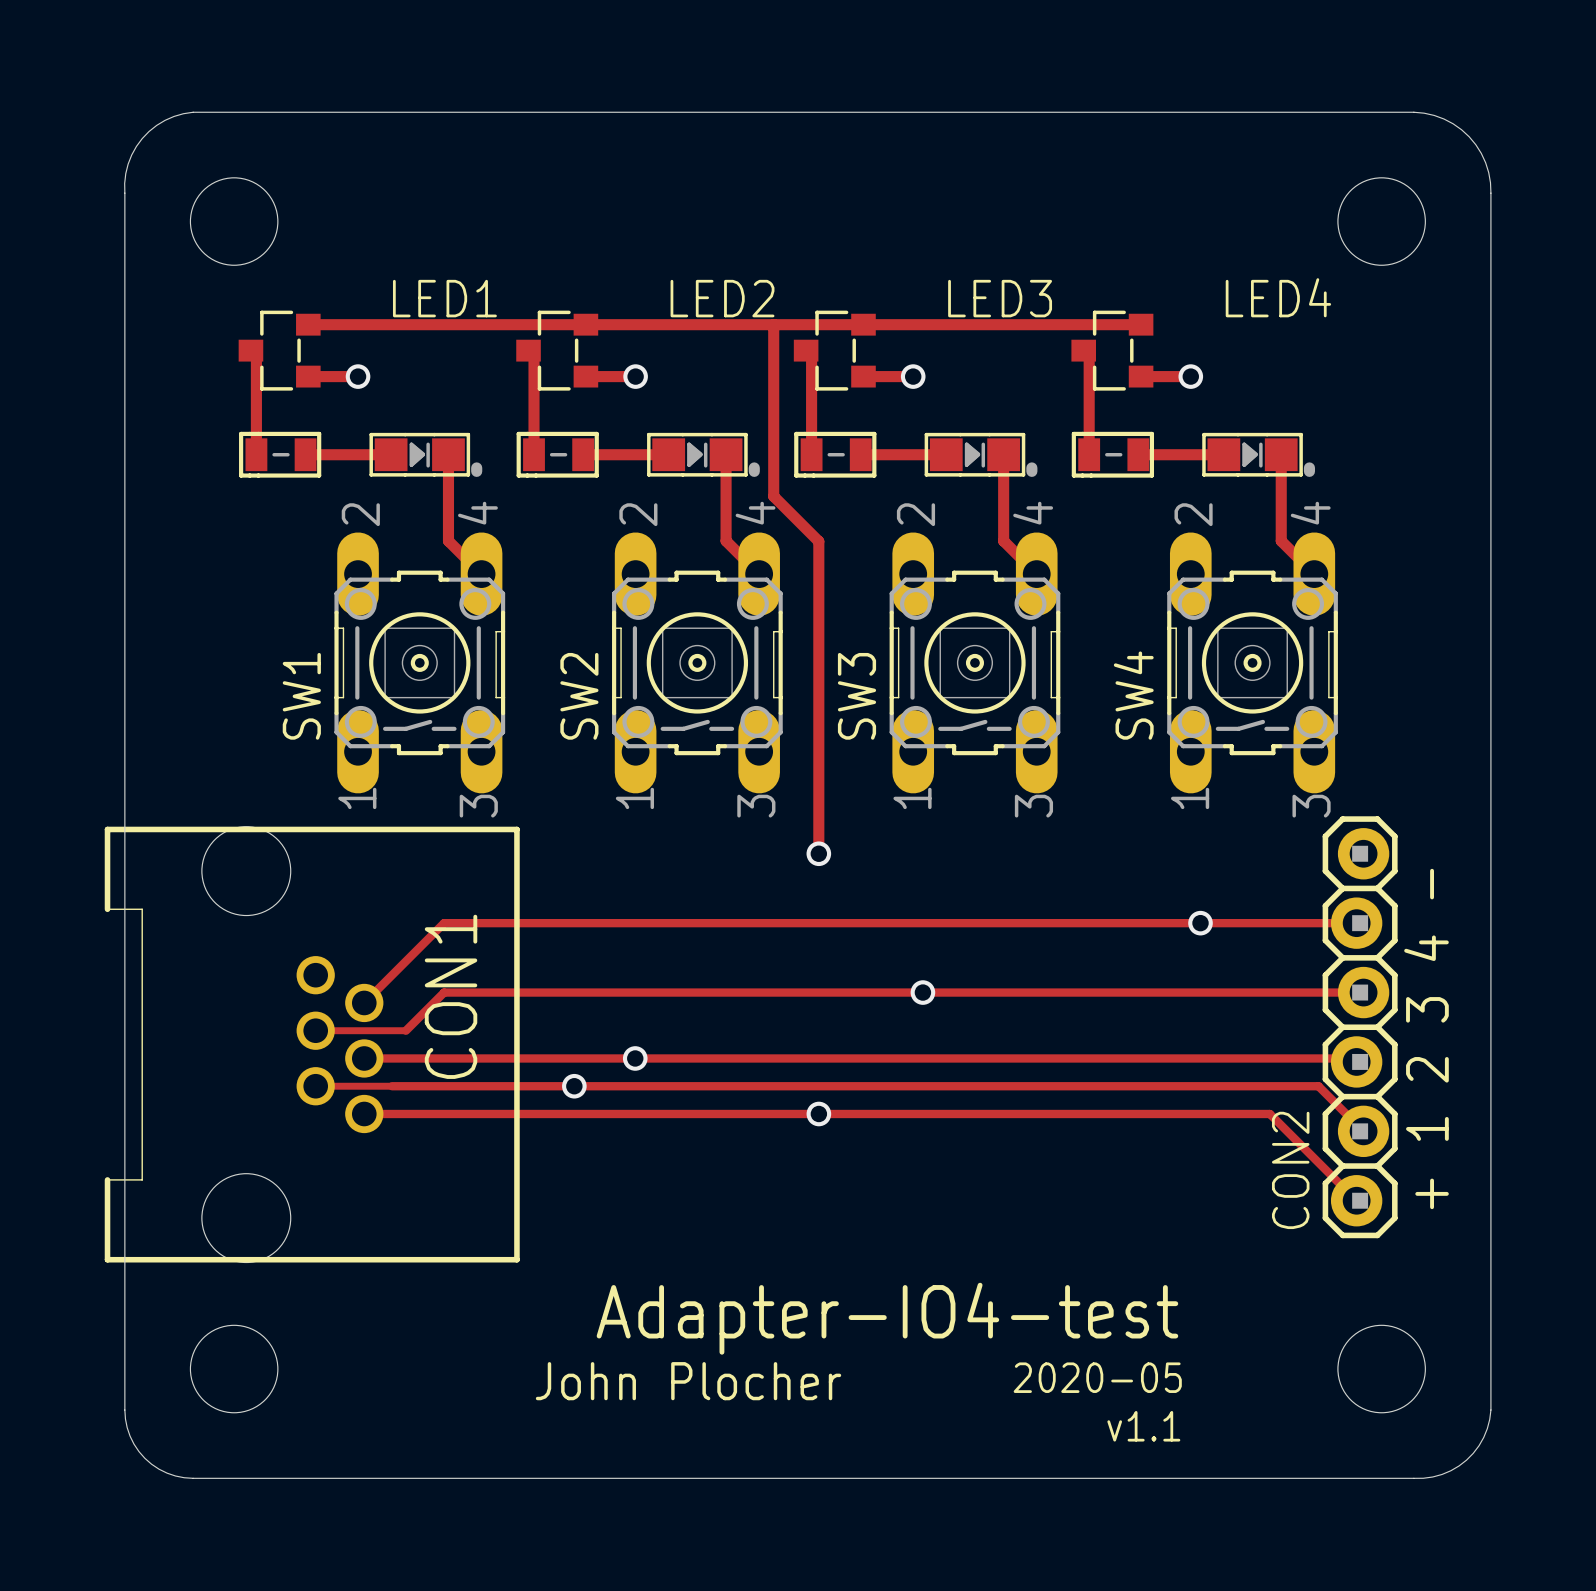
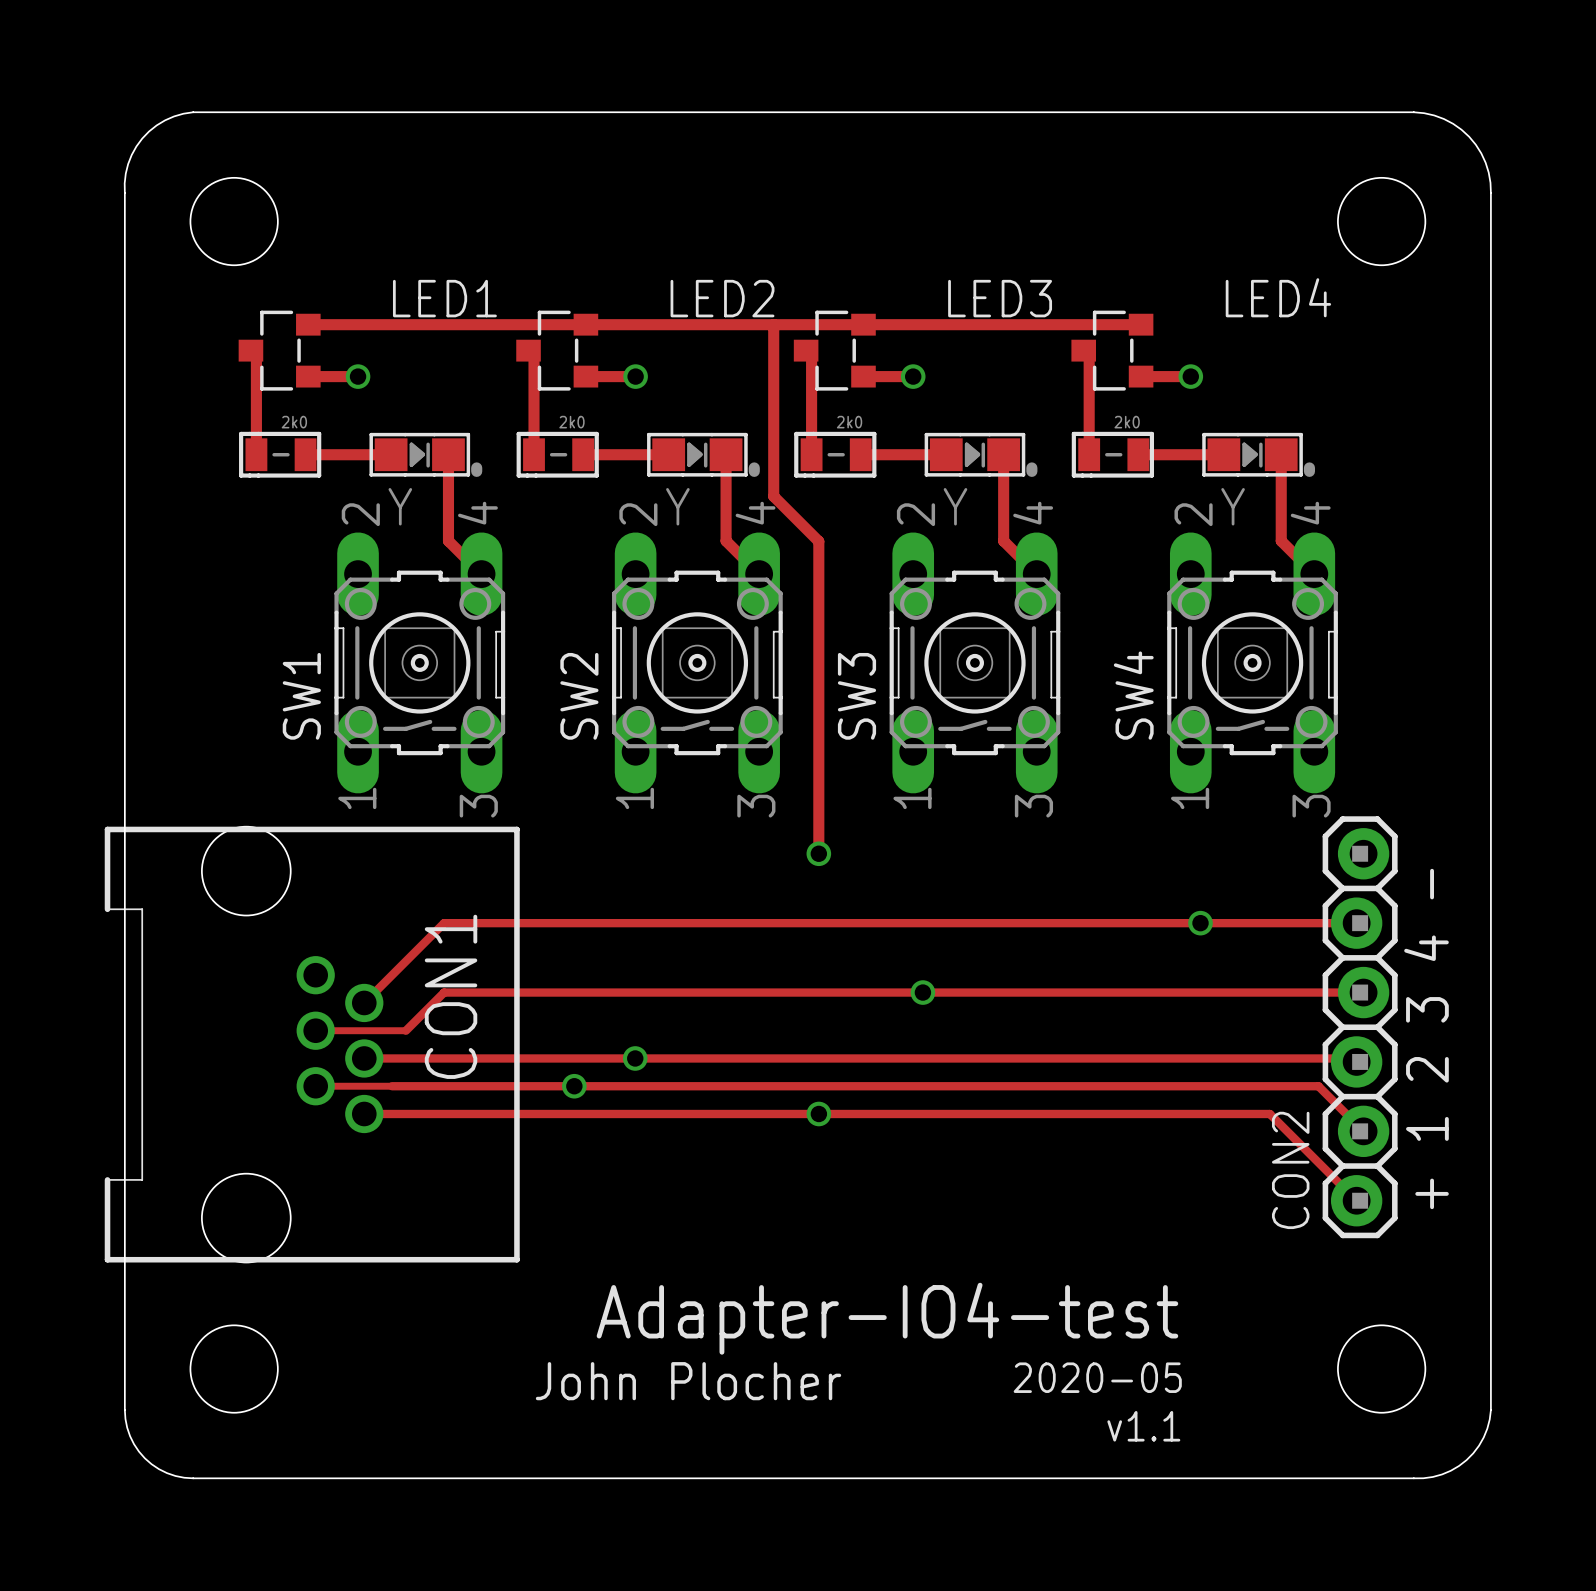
part value: none -> 2k0 (294, 422)
part value: none -> 2k0 (571, 422)
part value: none -> 2k0 (849, 422)
part value: none -> 2k0 (1127, 422)
LED1 value: none -> Y (400, 506)
LED2 value: none -> Y (677, 506)
LED3 value: none -> Y (955, 506)
LED4 value: none -> Y (1233, 506)

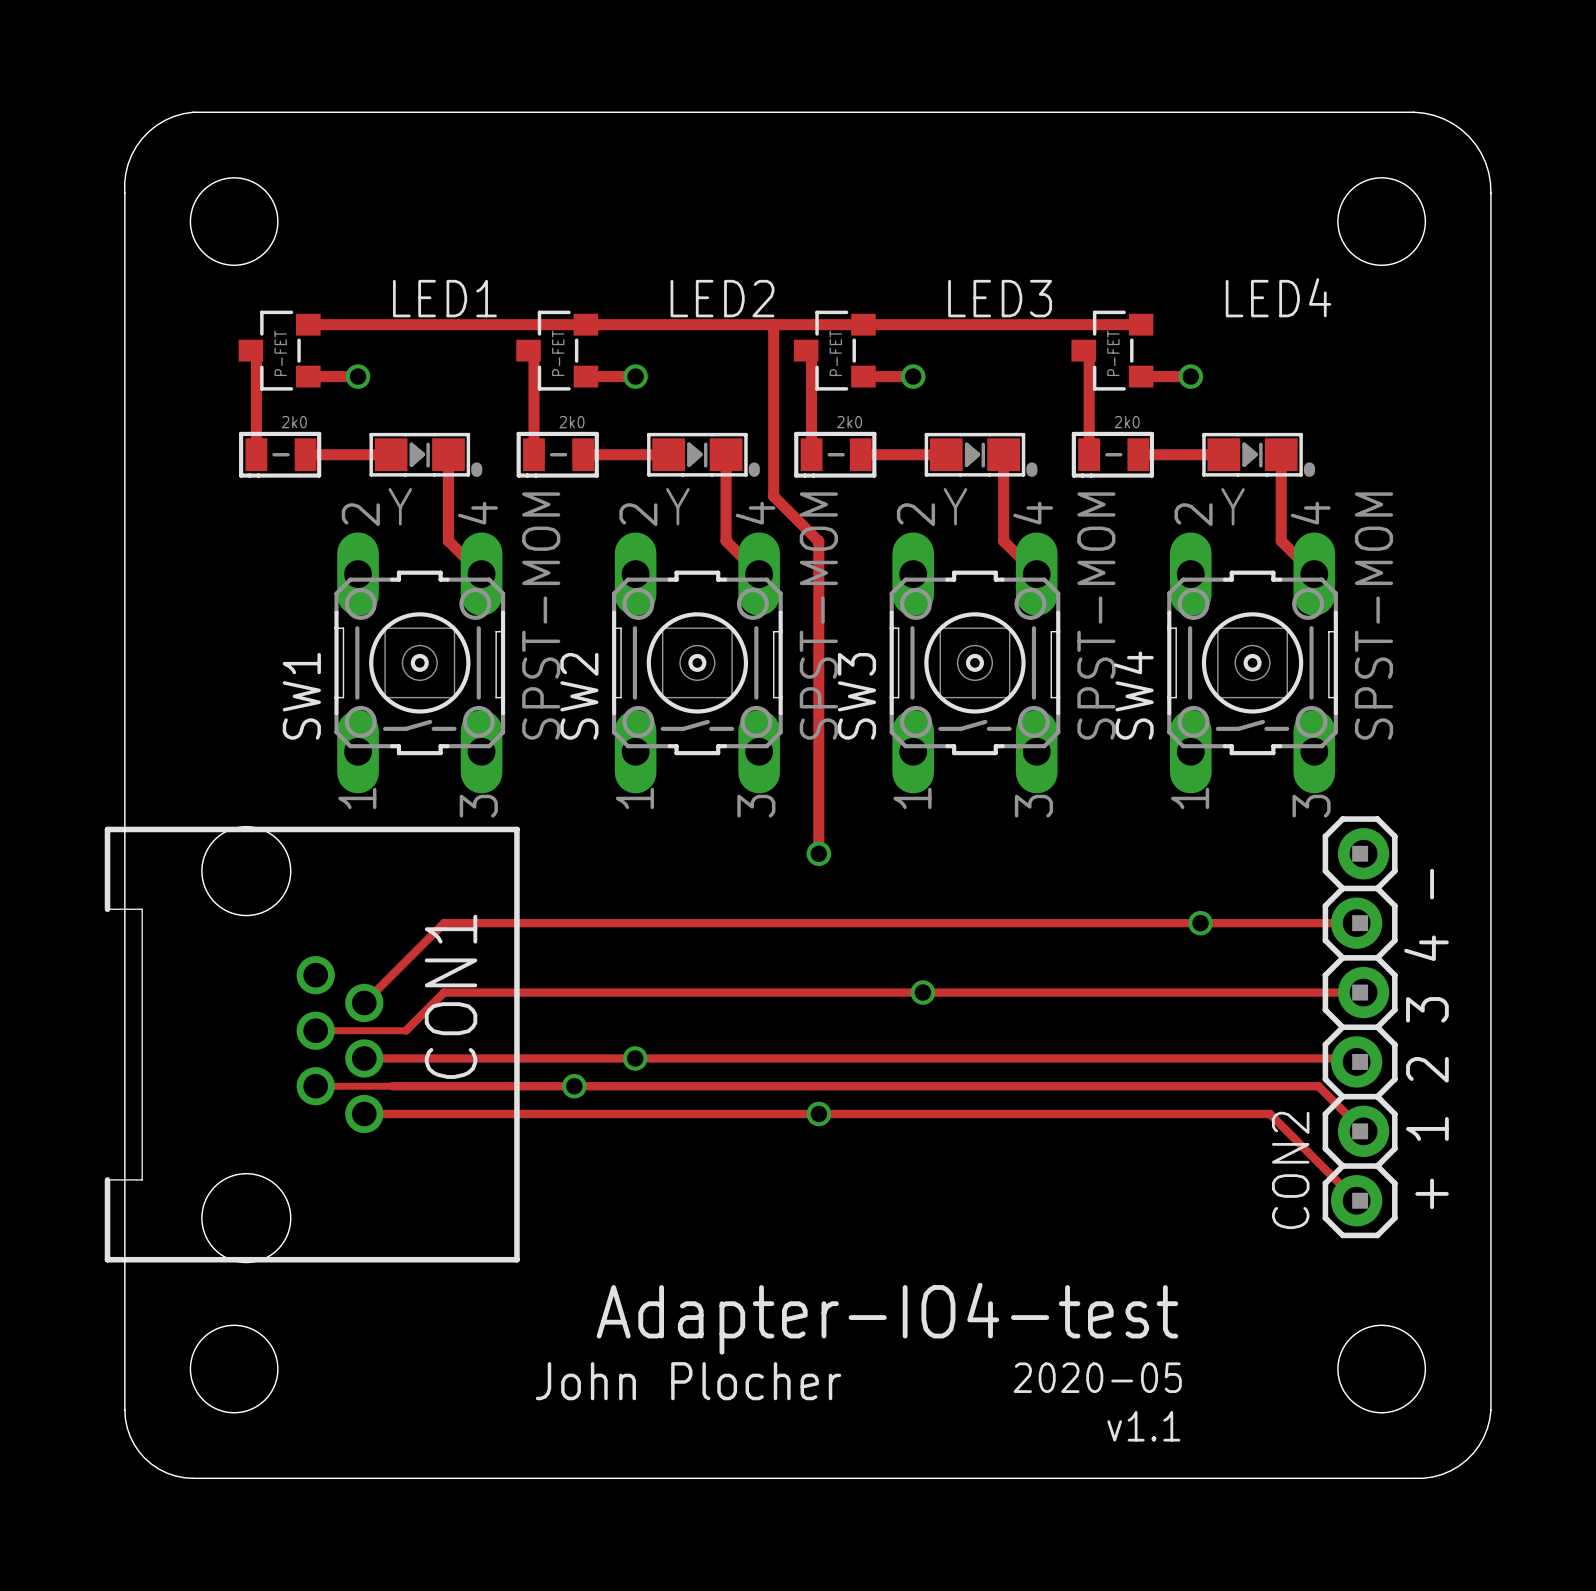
part value: none -> P-FET (280, 353)
part value: none -> P-FET (558, 353)
part value: none -> P-FET (835, 353)
part value: none -> P-FET (1113, 353)
SW1 value: none -> SPST-MOM (541, 616)
SW2 value: none -> SPST-MOM (818, 616)
SW3 value: none -> SPST-MOM (1096, 616)
SW4 value: none -> SPST-MOM (1373, 616)

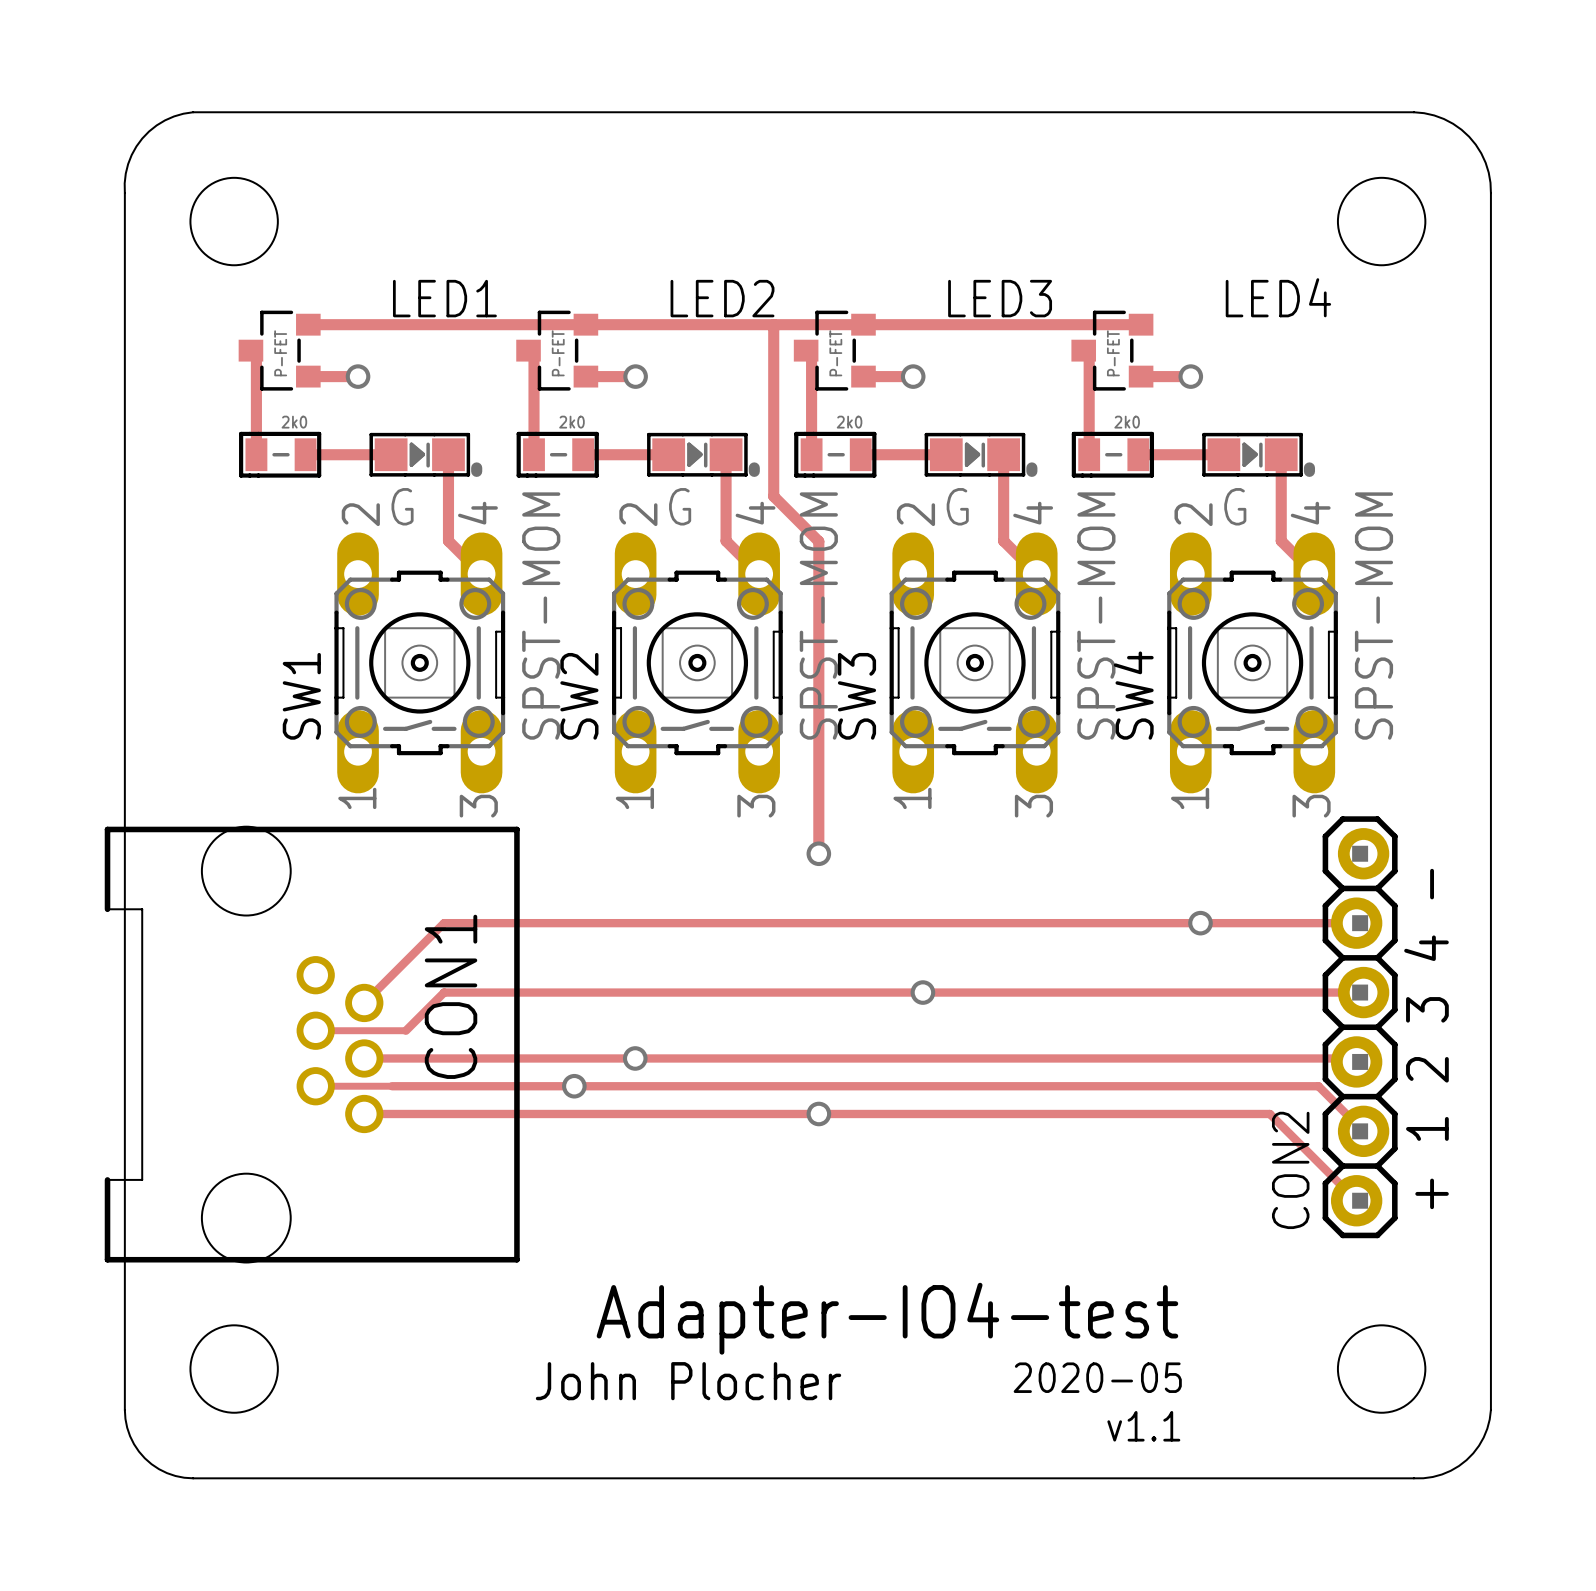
LED1 value: Y (400, 506) -> G (402, 506)
LED2 value: Y (677, 506) -> G (680, 506)
LED3 value: Y (955, 506) -> G (957, 506)
LED4 value: Y (1233, 506) -> G (1235, 506)

